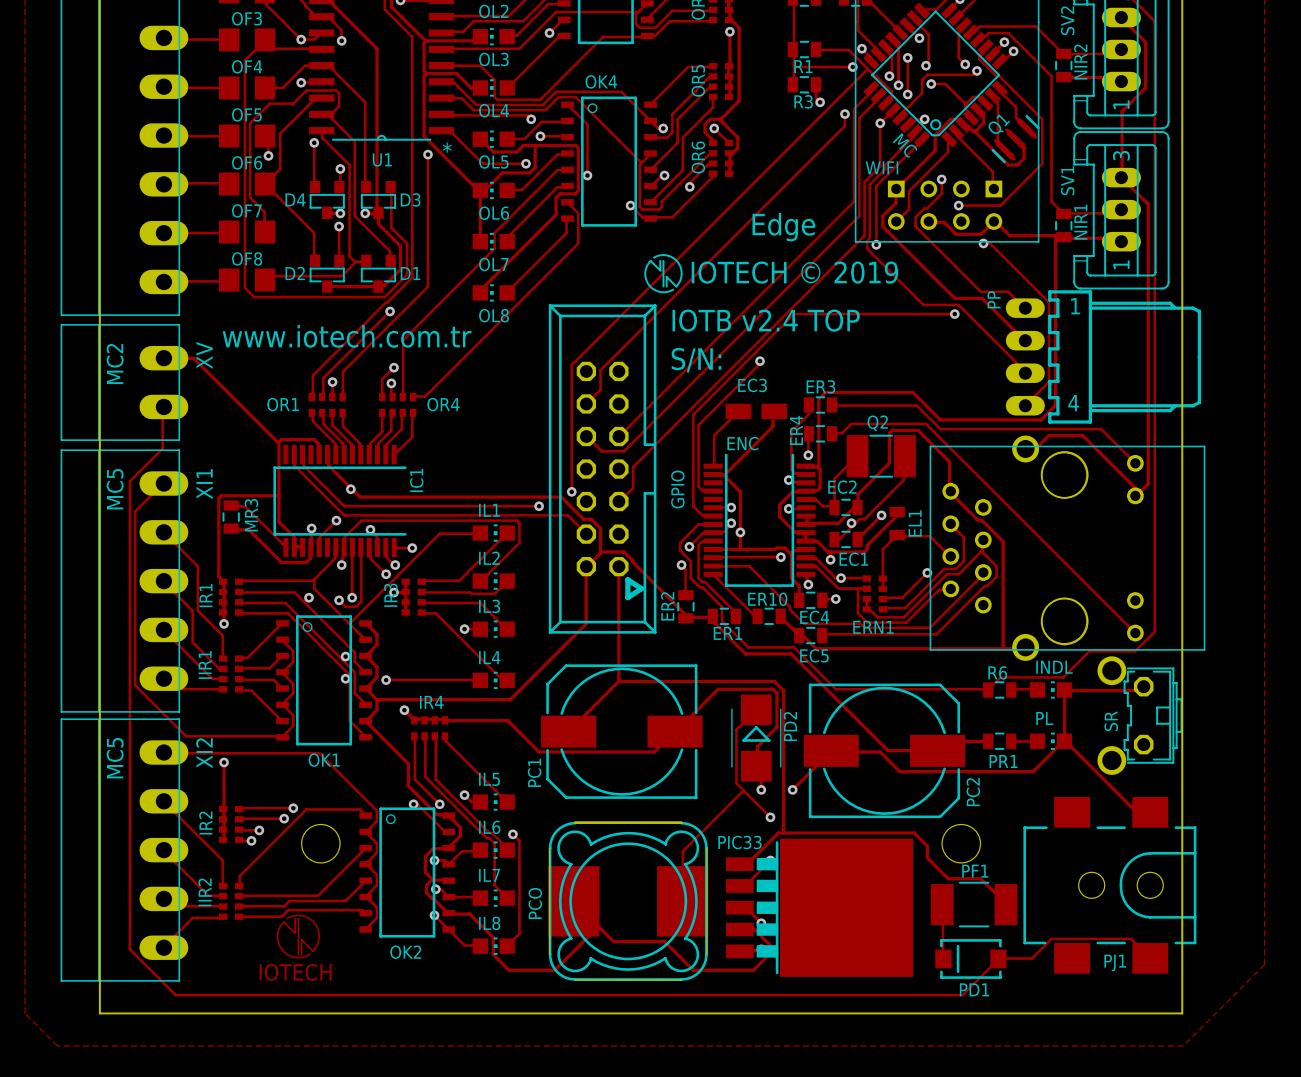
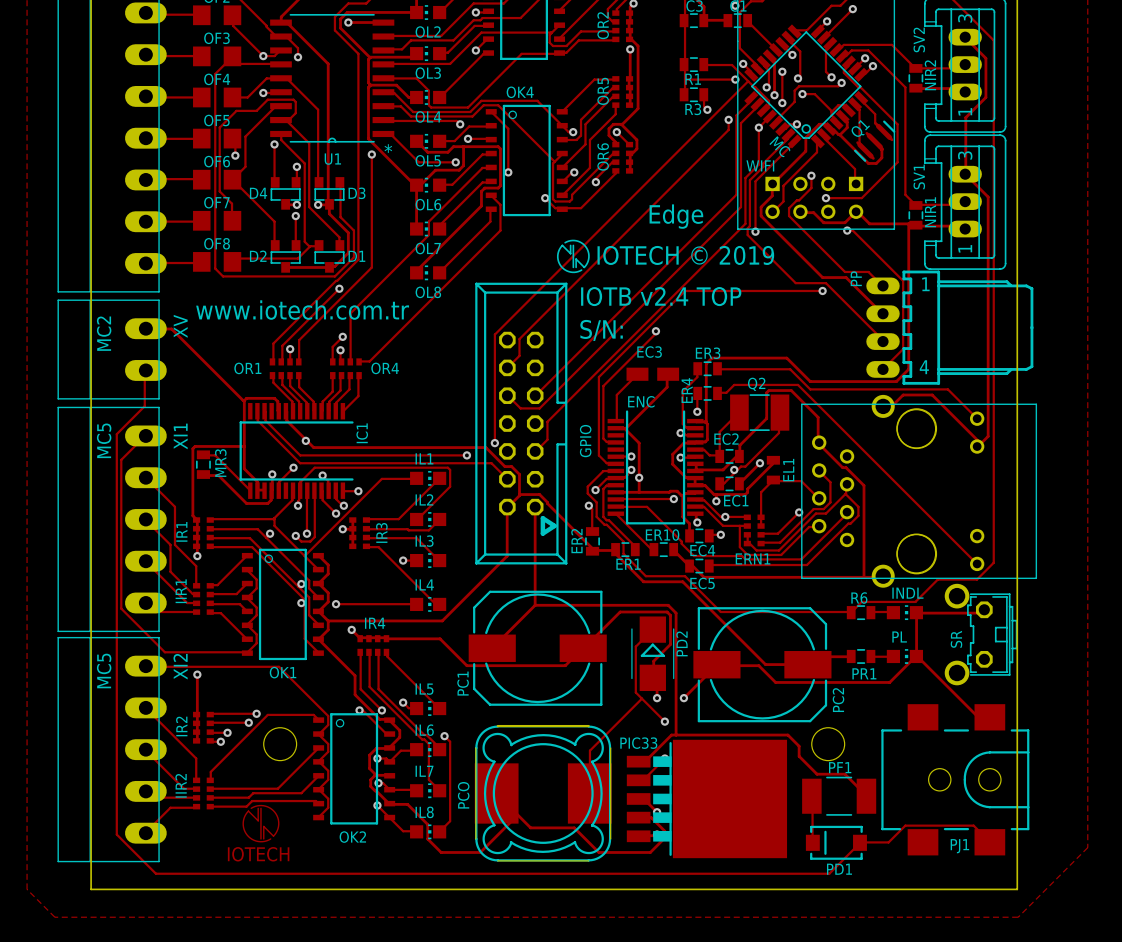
IR3 name position: IR3 (390, 595) -> IR3 (381, 532)

